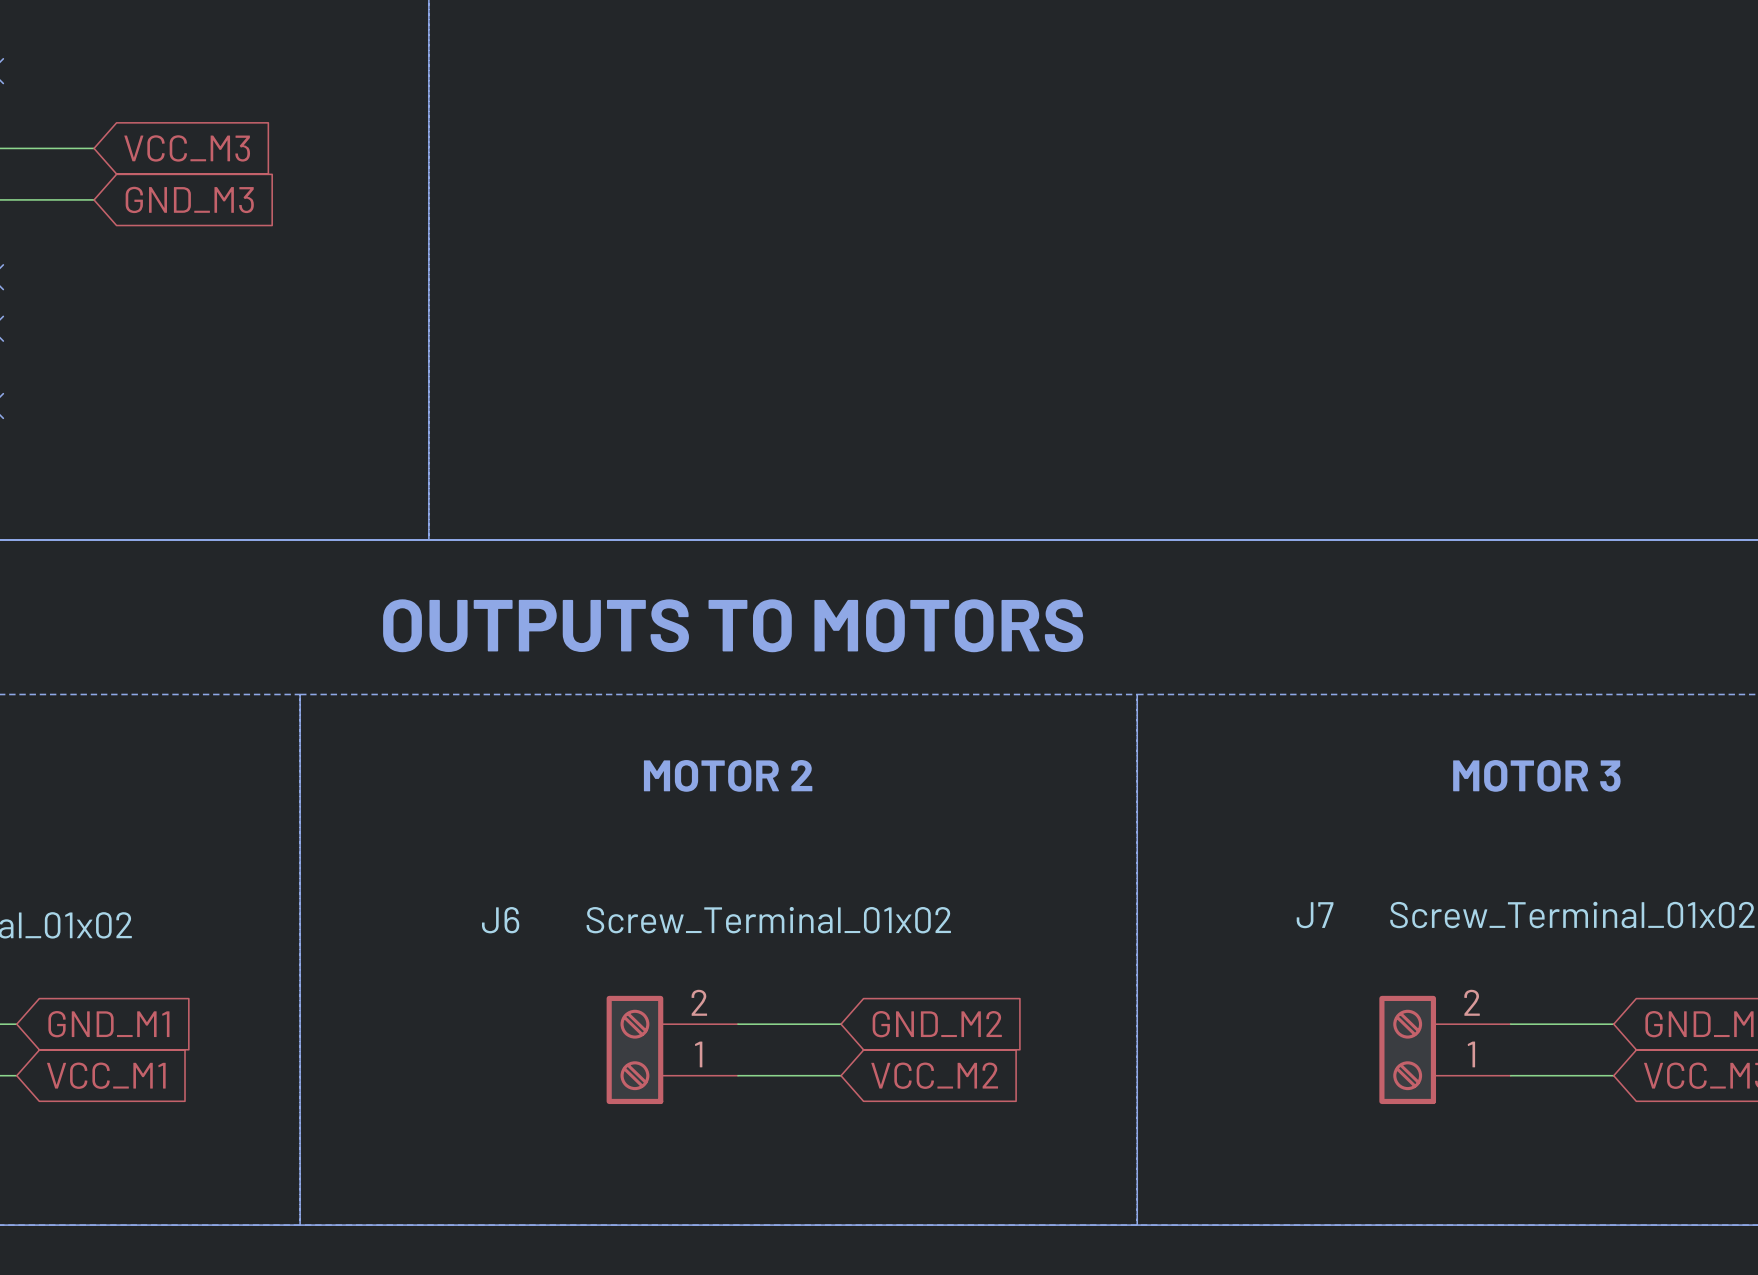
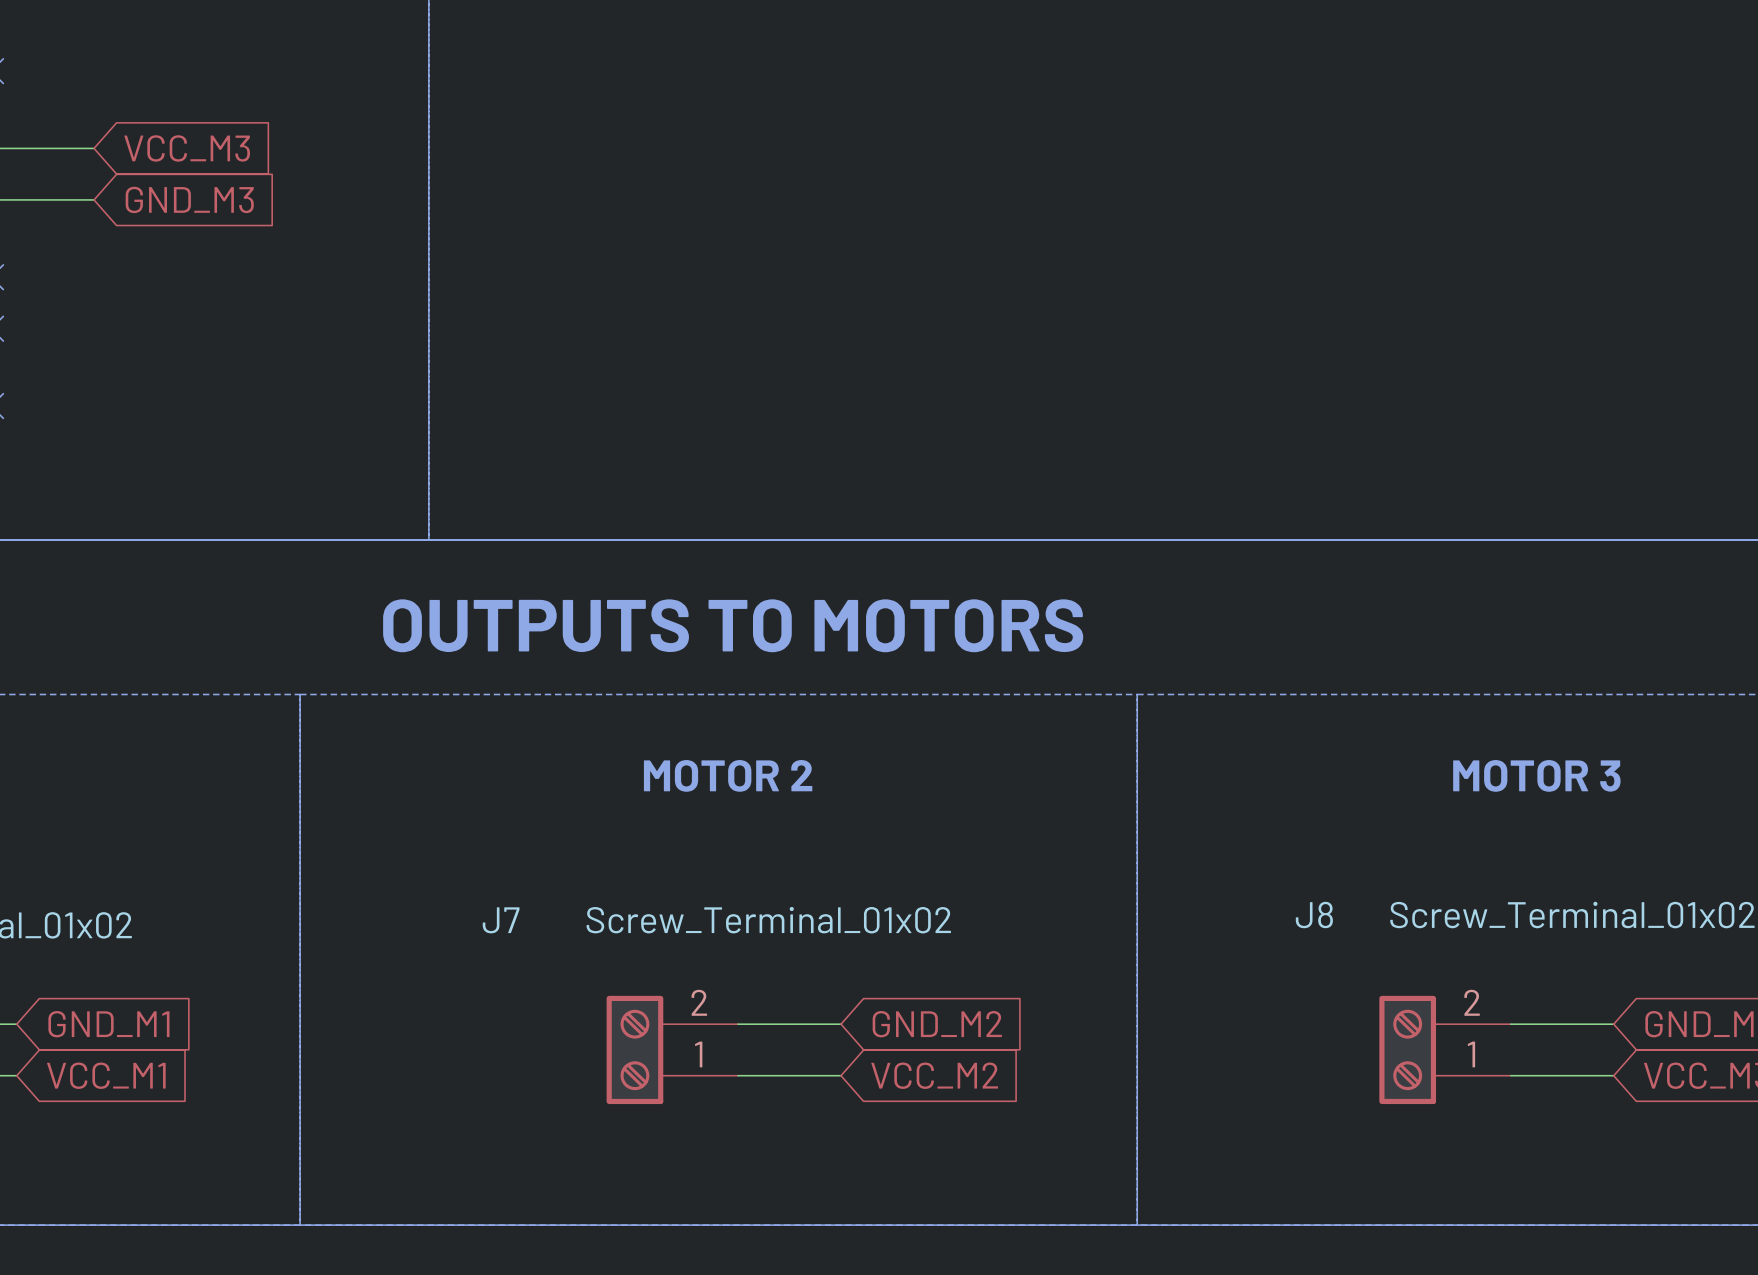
J7 name: J7 (1315, 915) -> J8 (1314, 915)
J6 name: J6 (500, 920) -> J7 (501, 920)

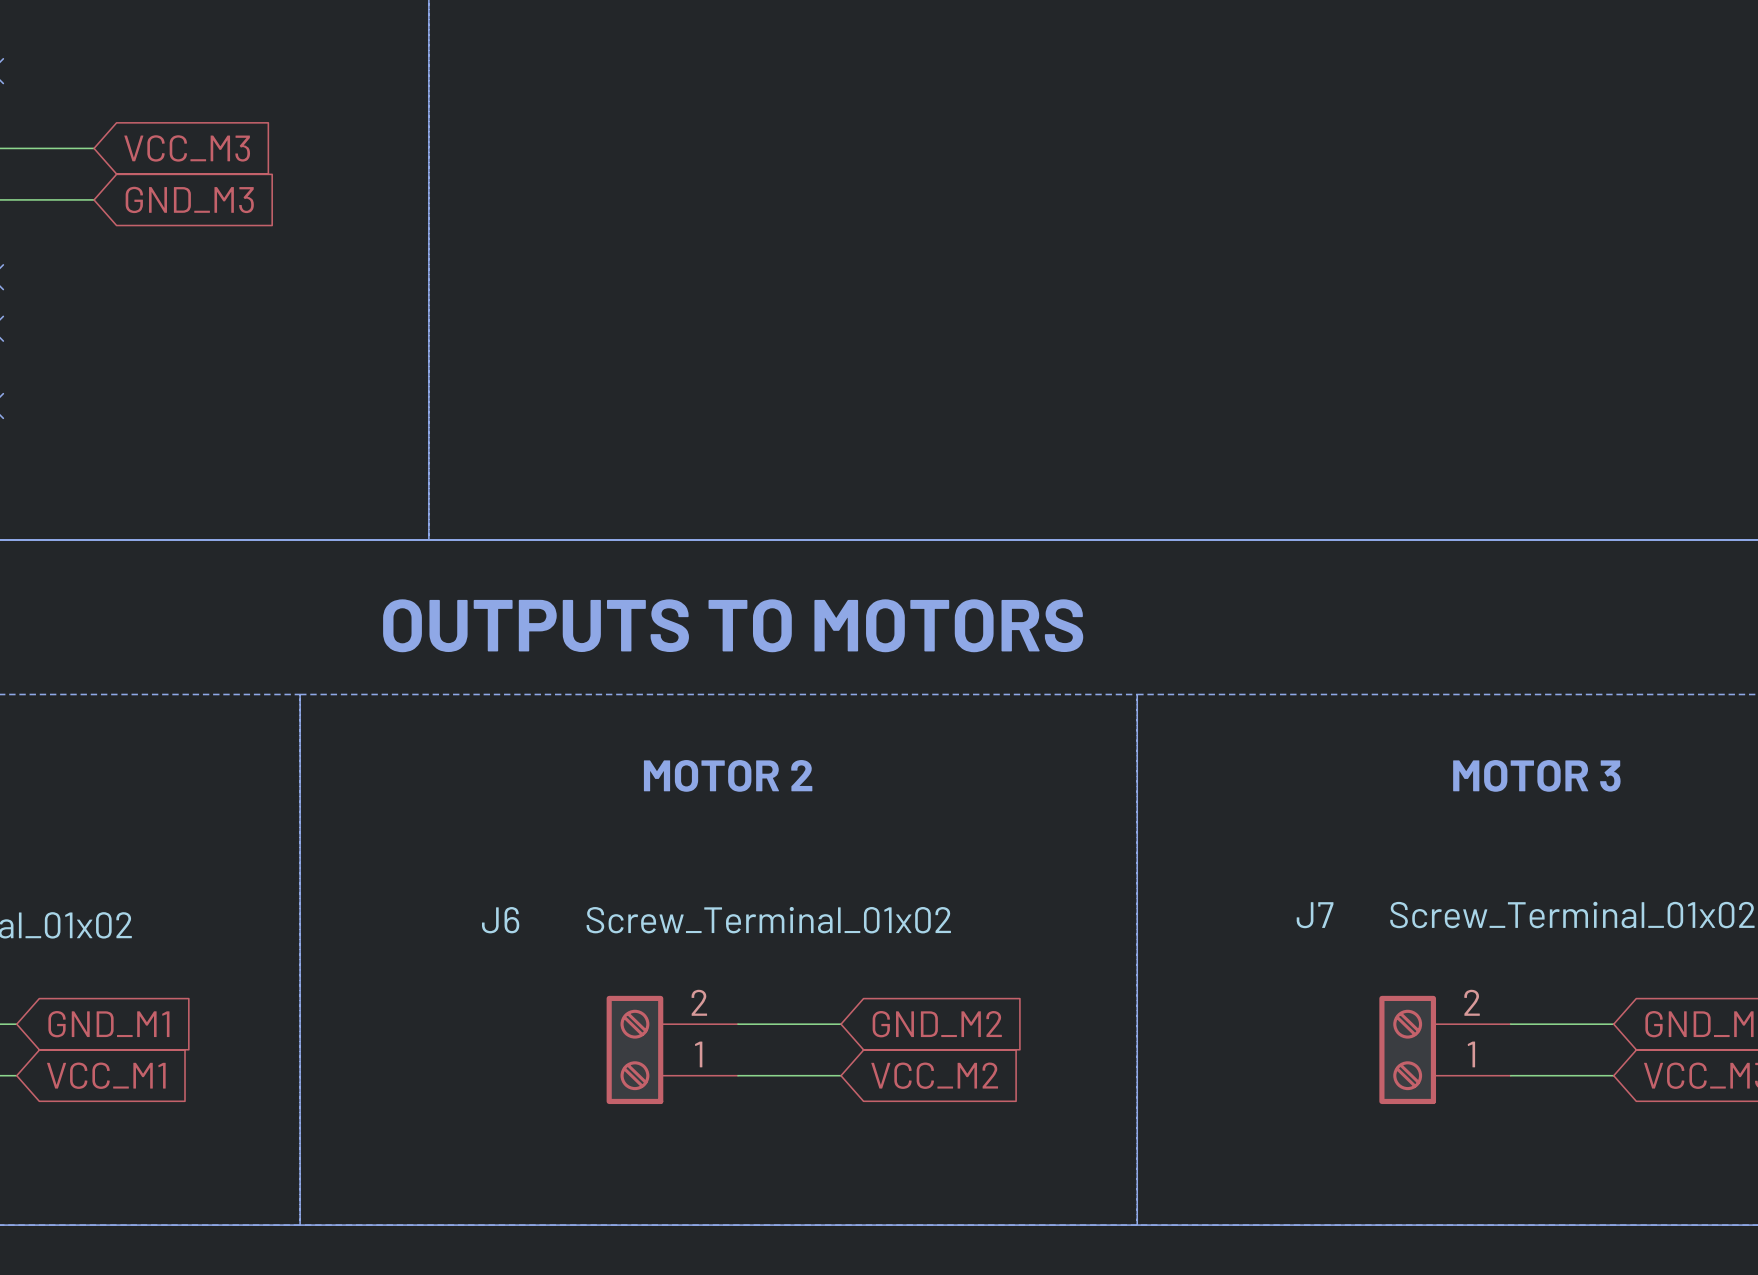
J8 name: J8 (1314, 915) -> J7 (1315, 915)
J7 name: J7 (501, 920) -> J6 (500, 920)

